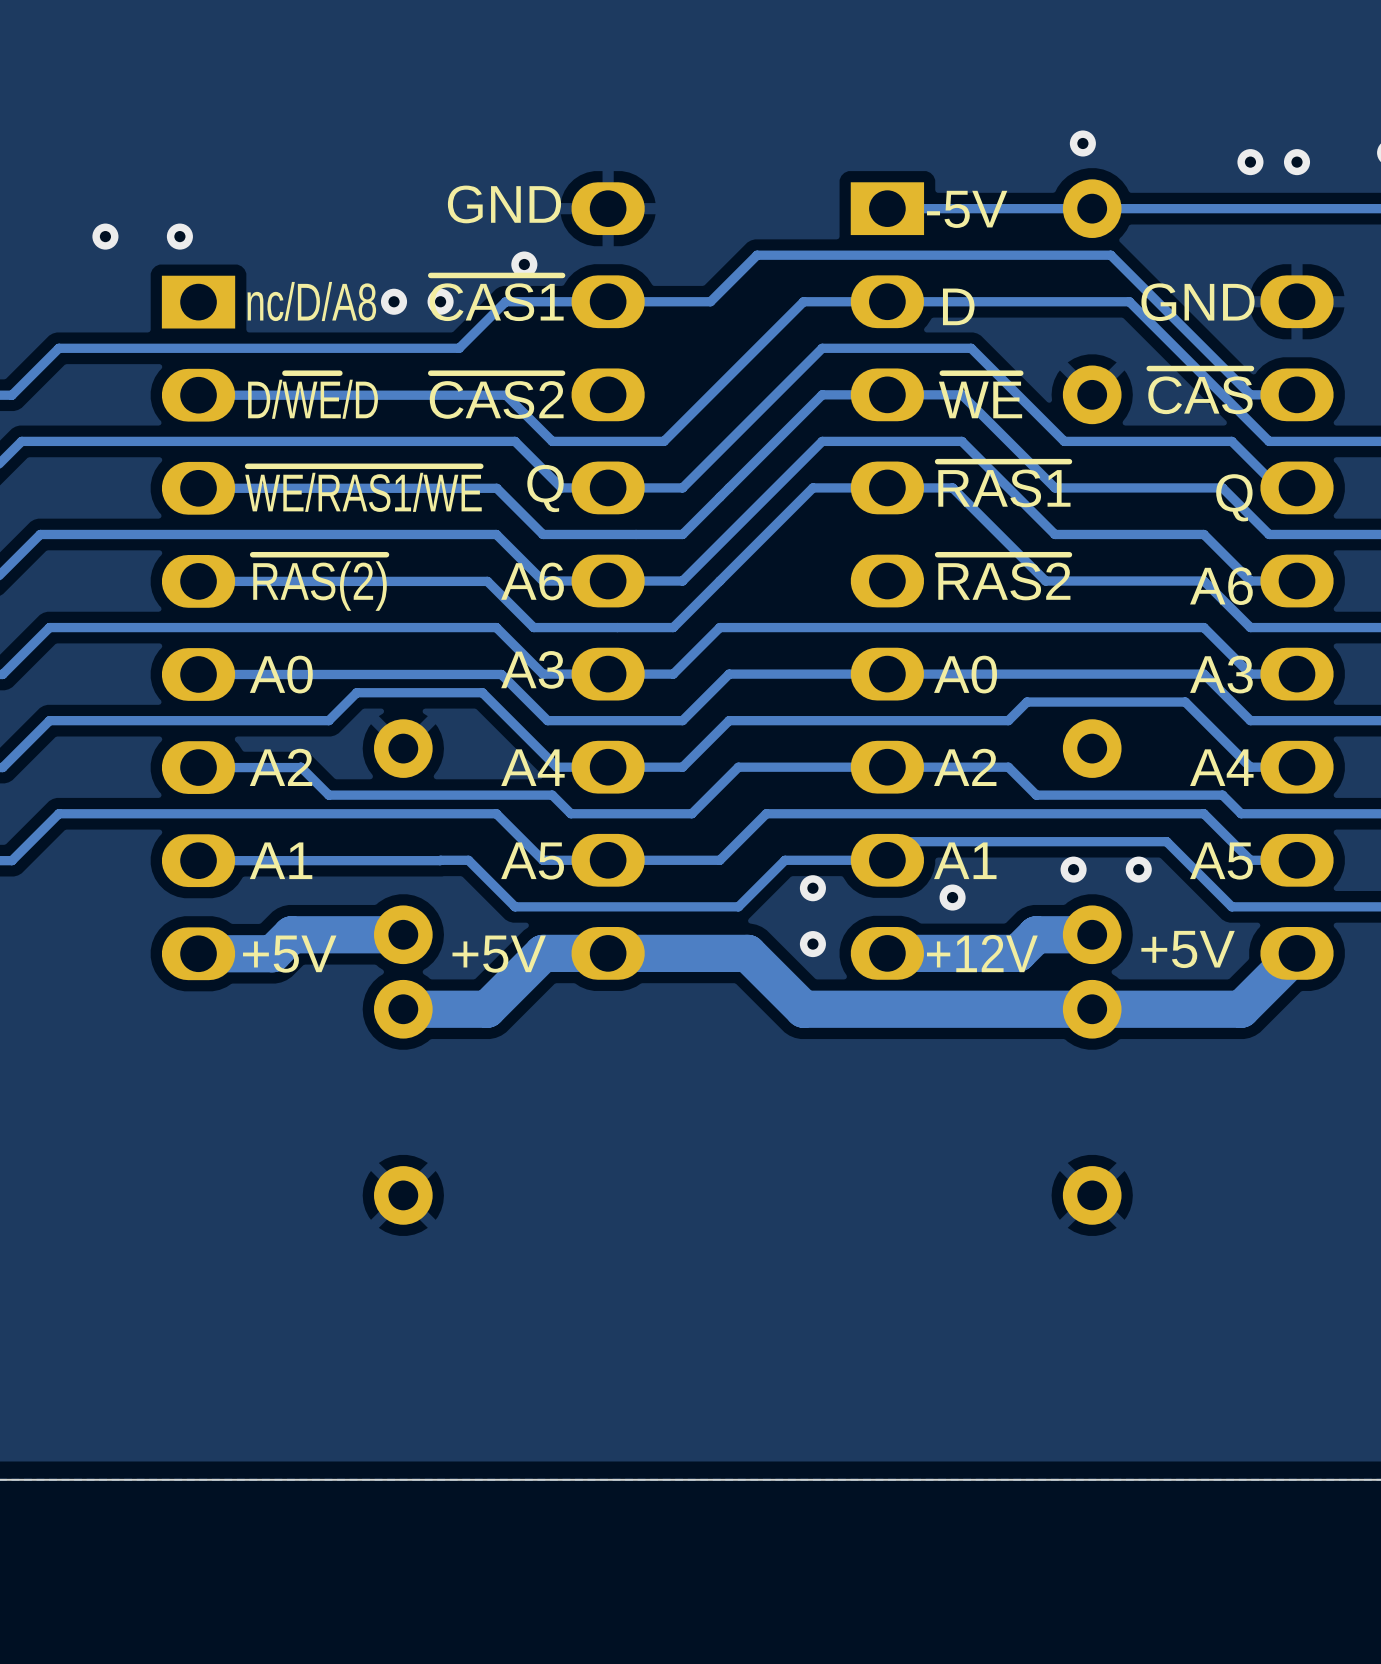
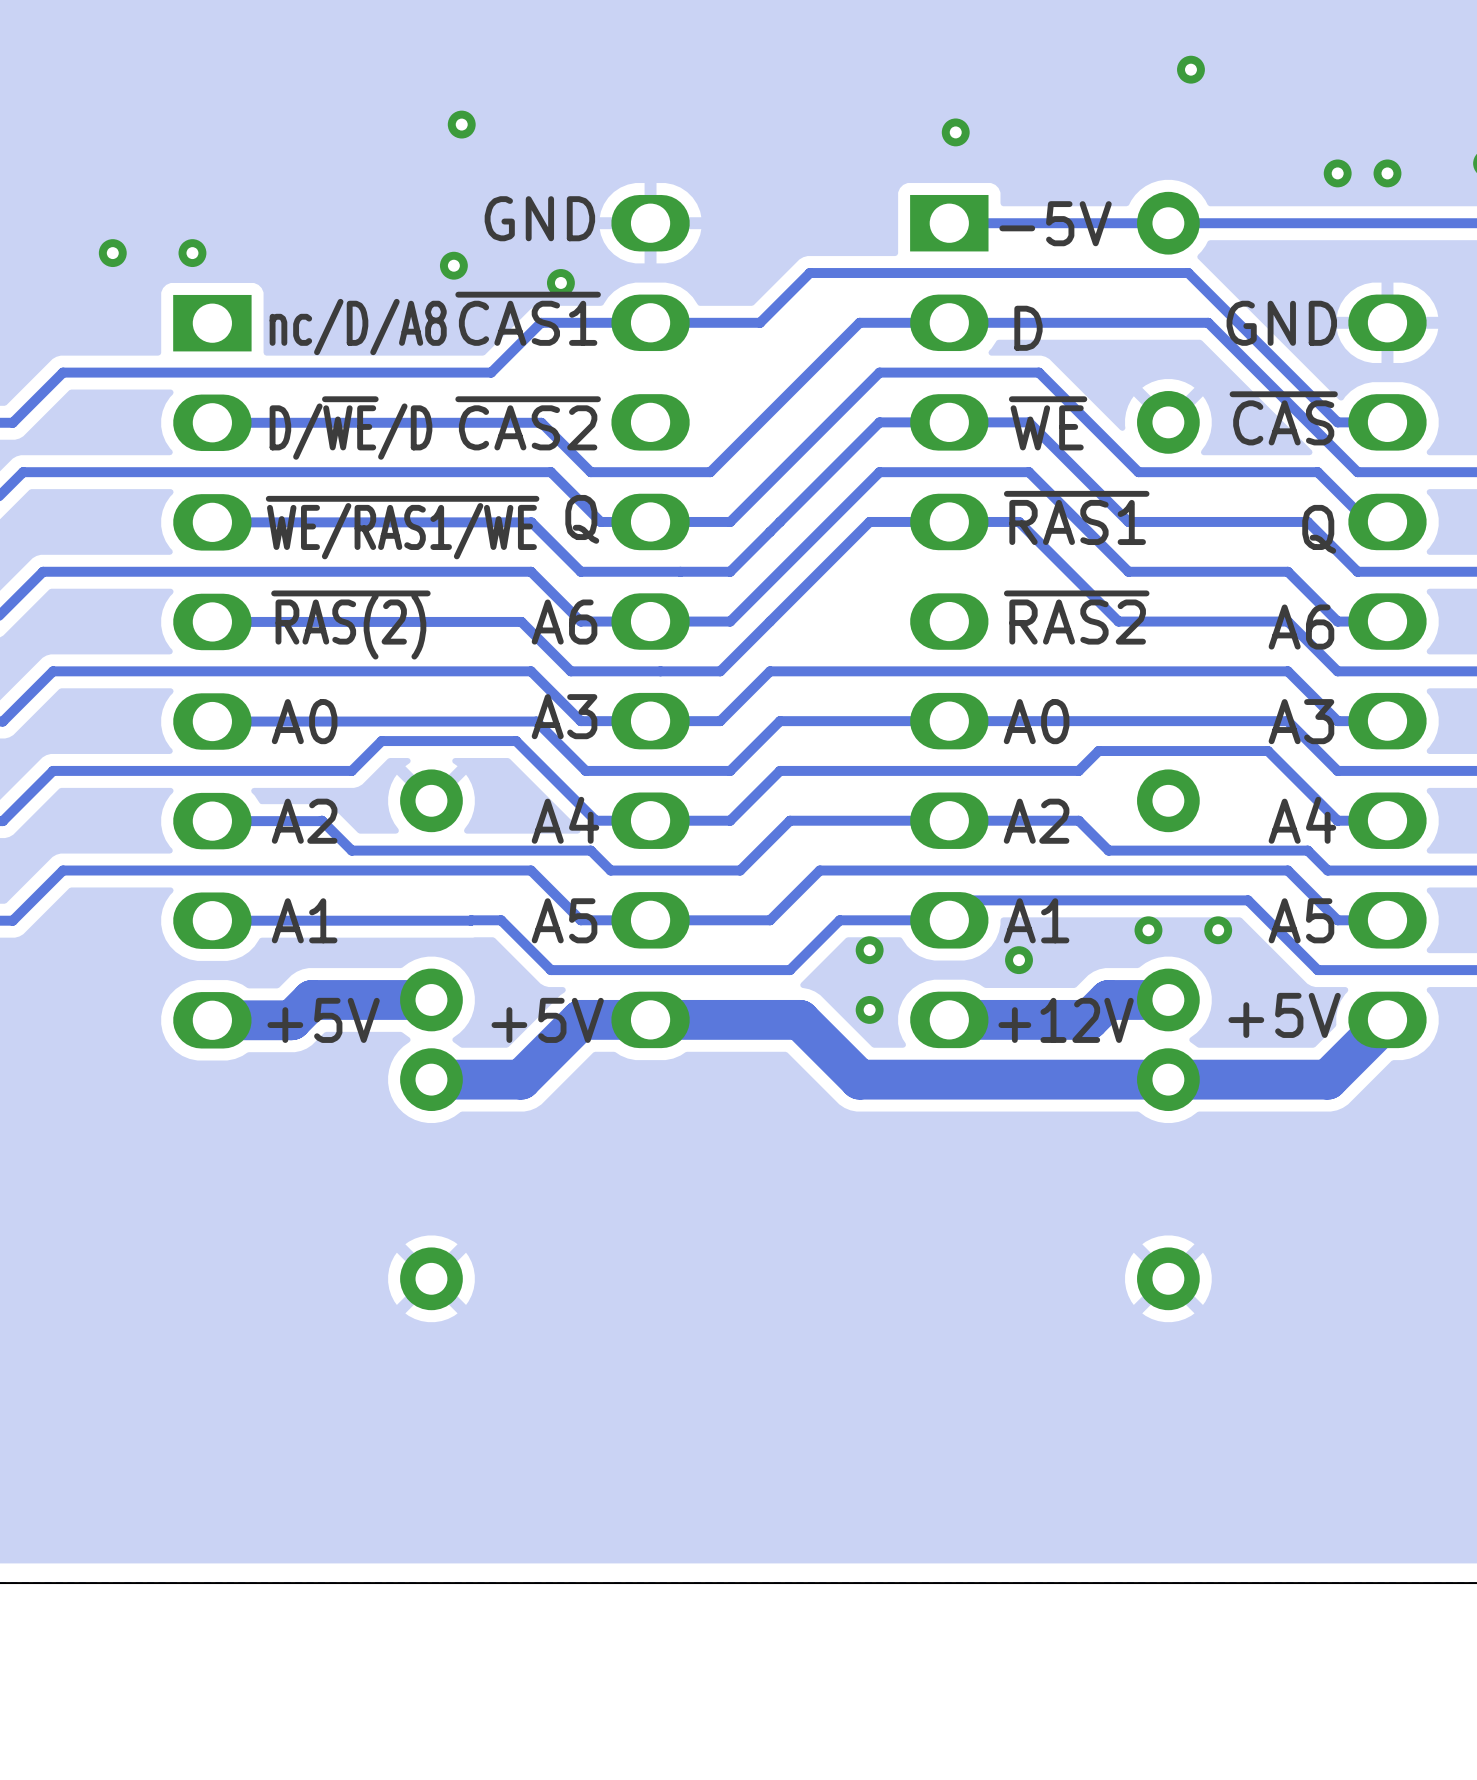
via: none -> (461, 124)
via: none -> (955, 132)
via position: (1082, 143) -> (1190, 69)
via: none -> (453, 265)
via: (394, 301) -> none
via: (440, 301) -> none

